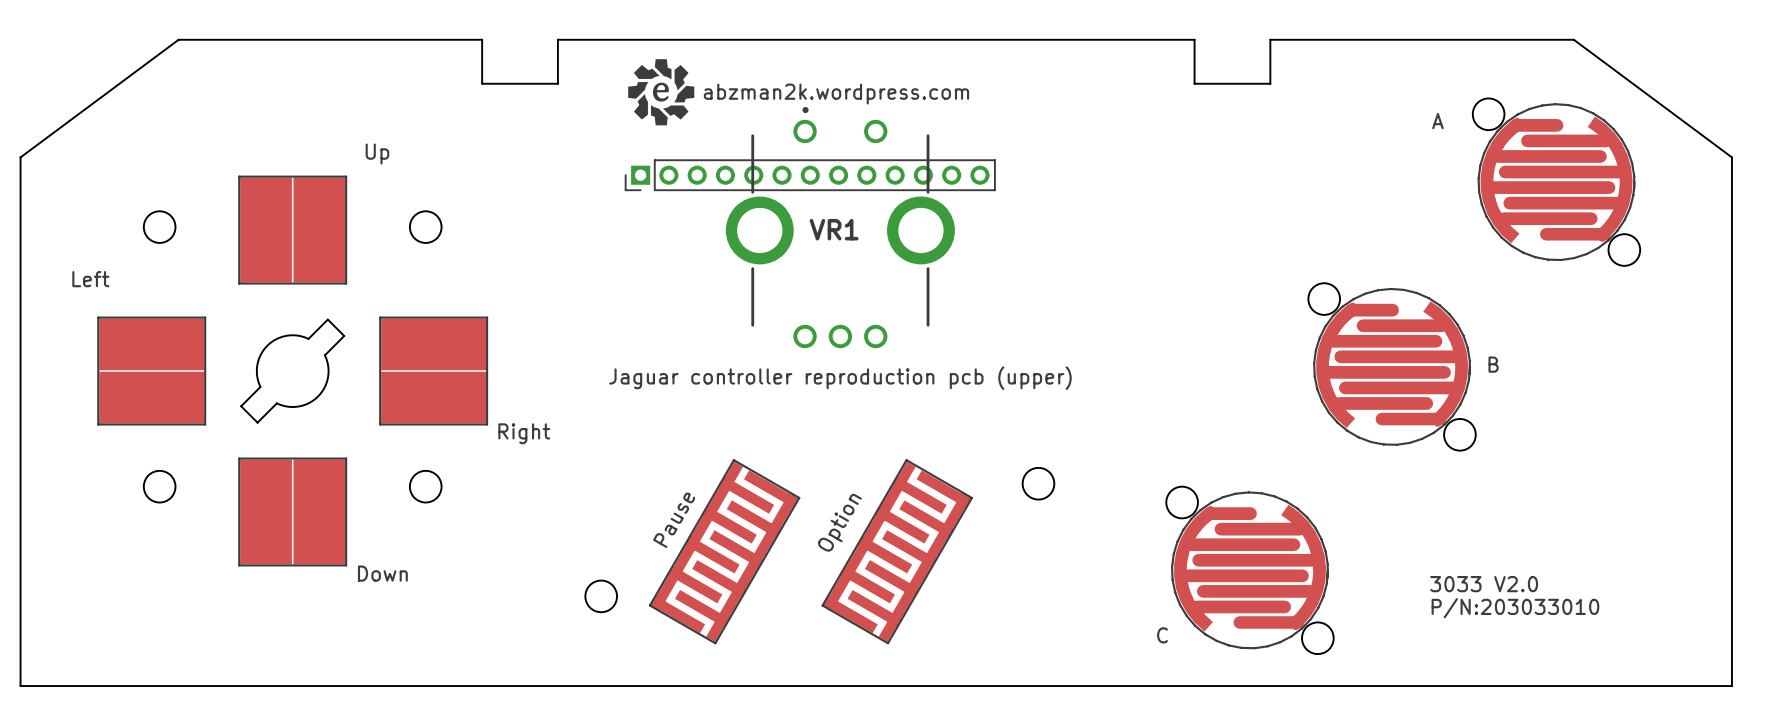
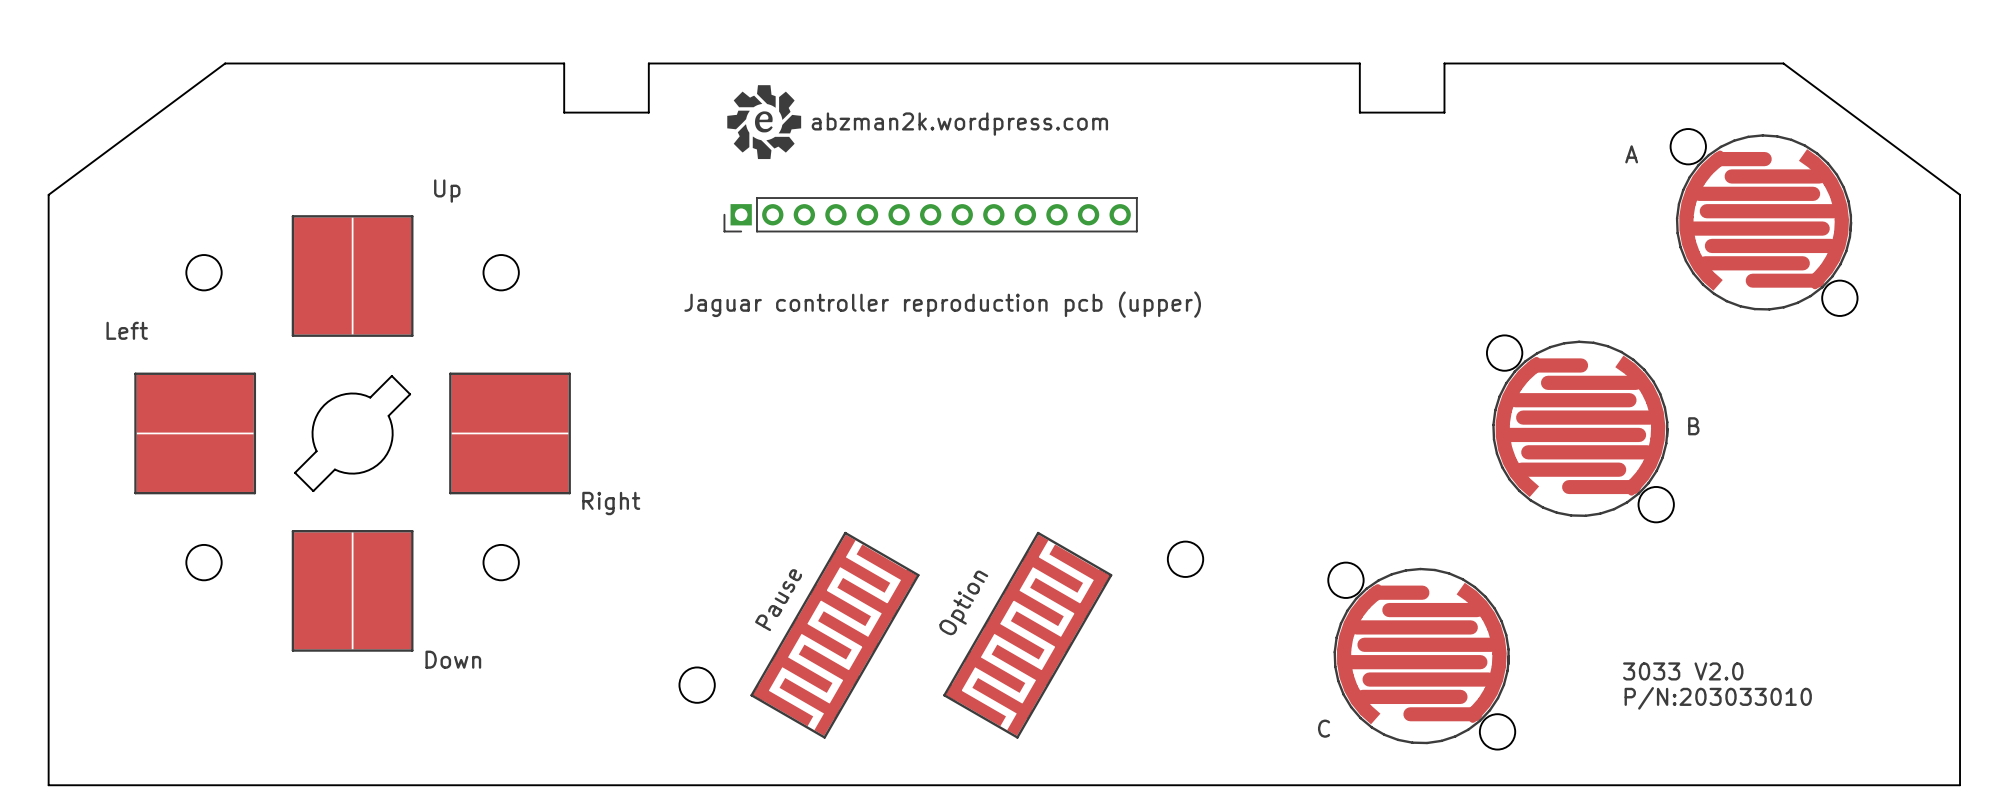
VR1: (840, 227) -> none
text position: Jaguar controller reproduction pcb (upper) (840, 378) -> Jaguar controller reproduction pcb (upper) (942, 304)

